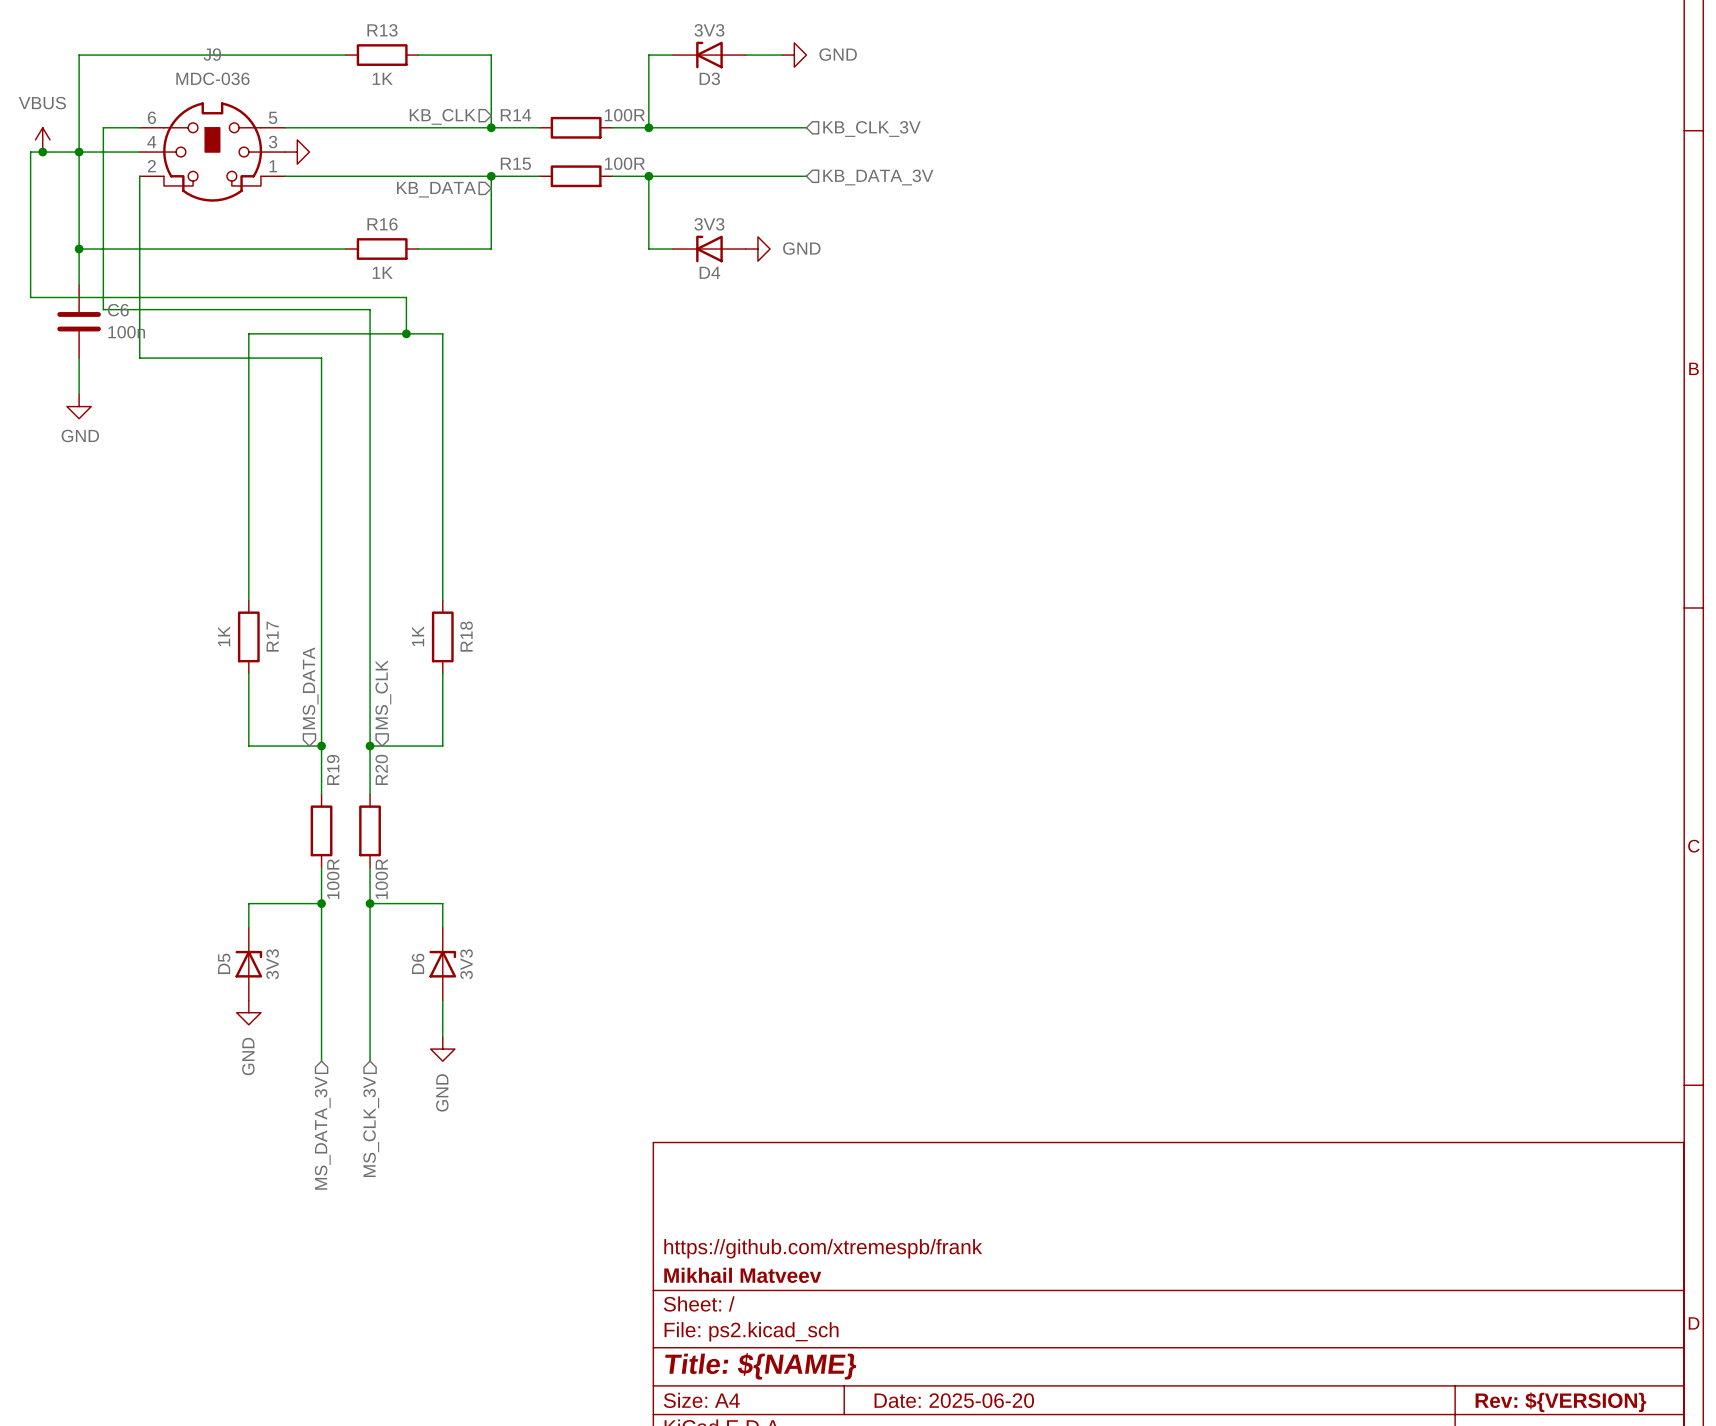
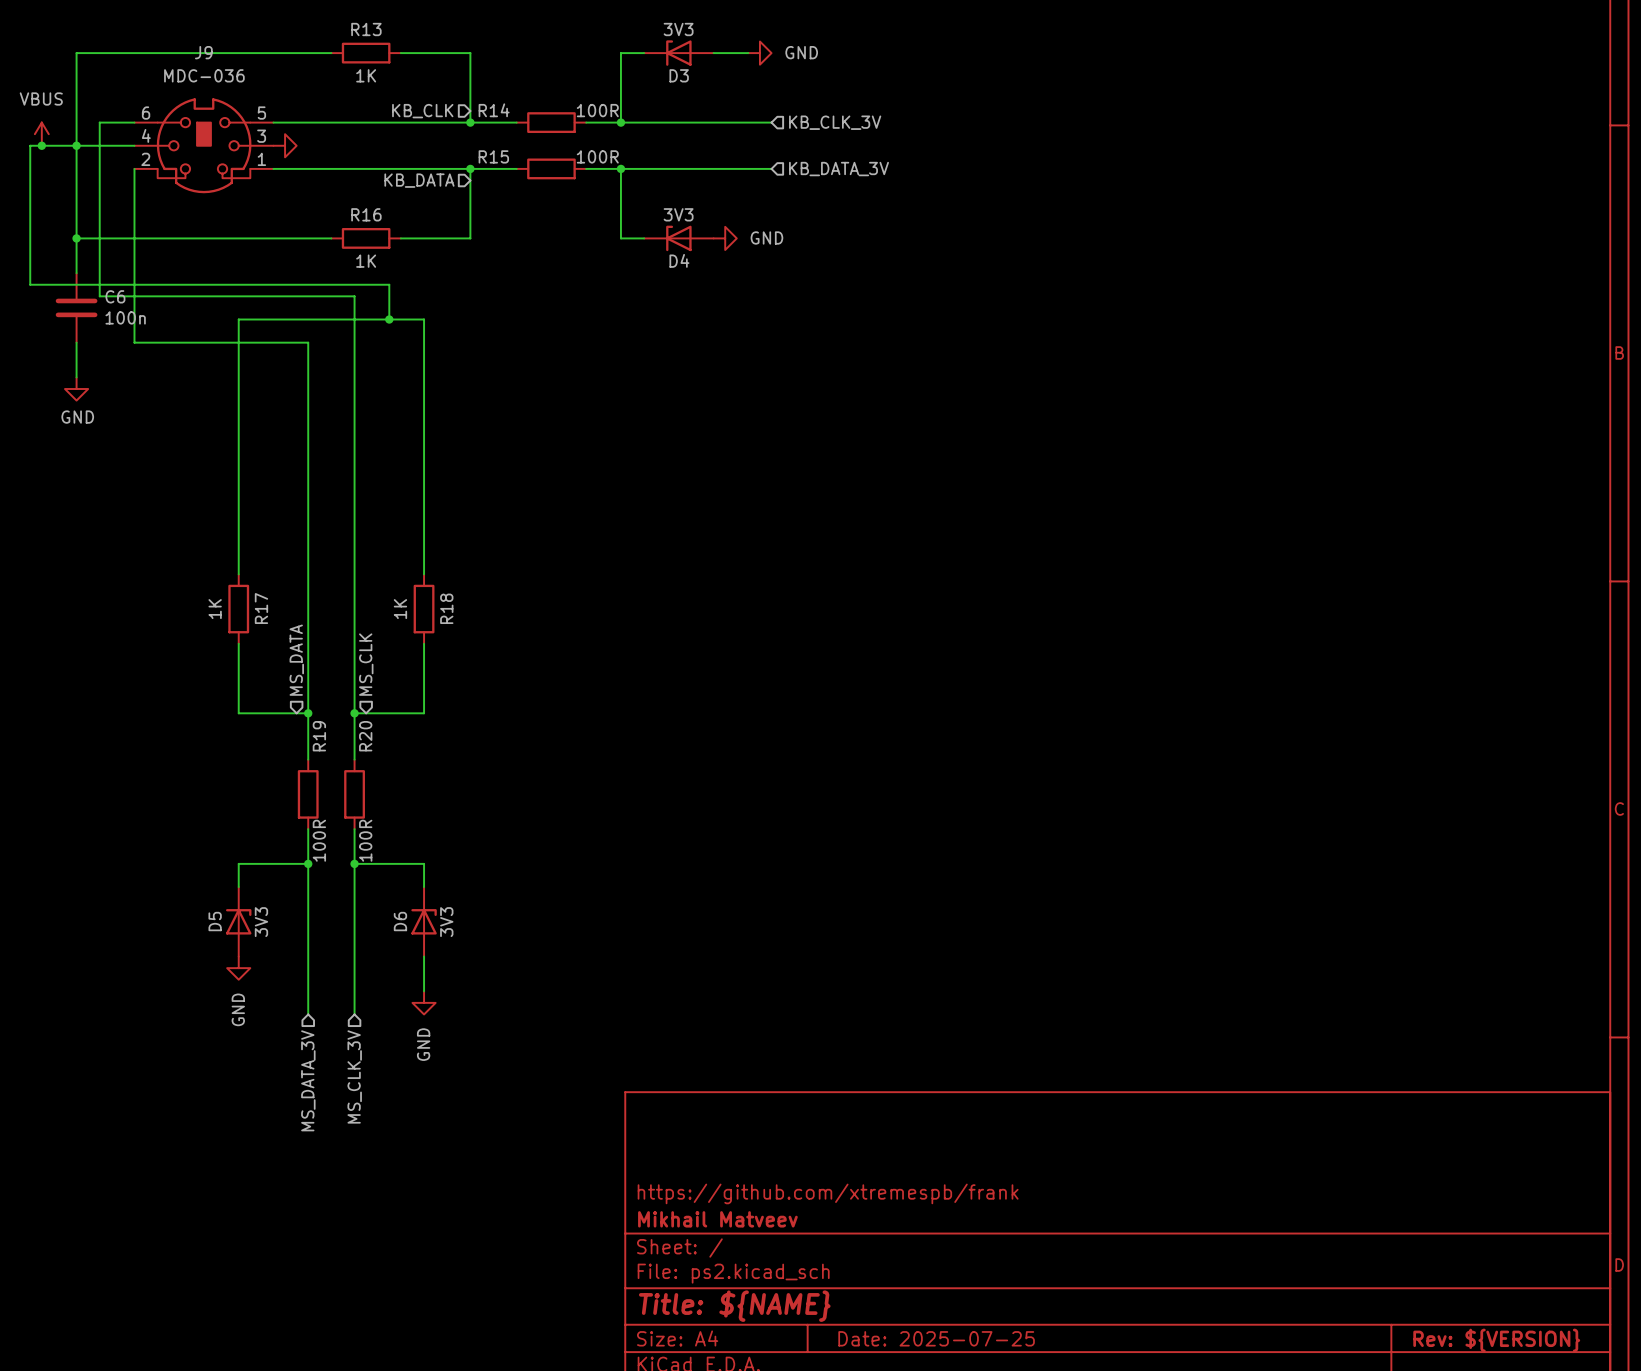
title block: Date: 2025-06-20 (954, 1400) -> Date: 2025-07-25 (936, 1338)

